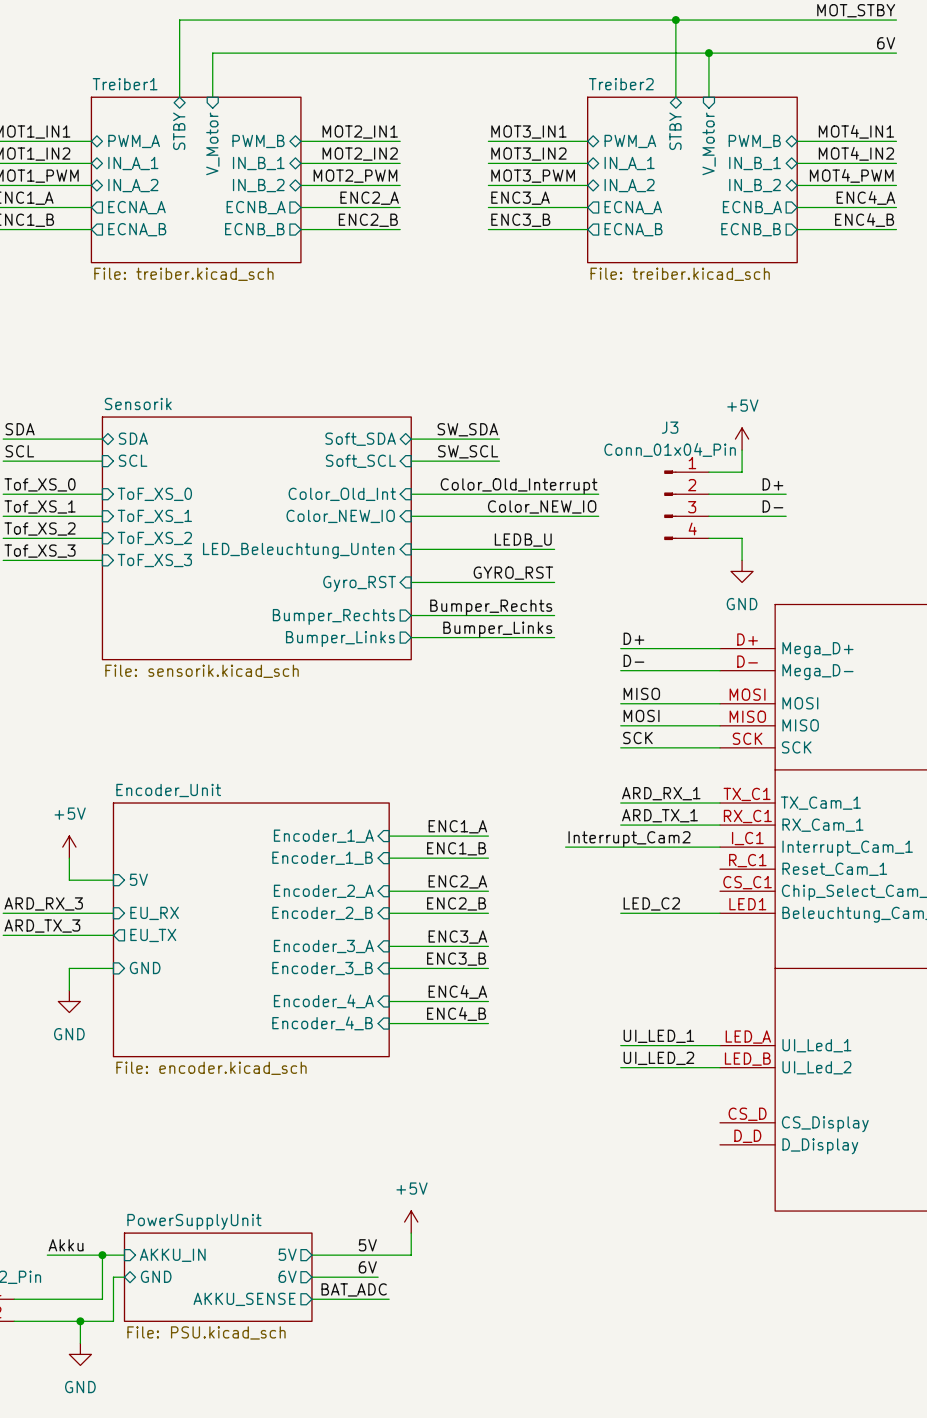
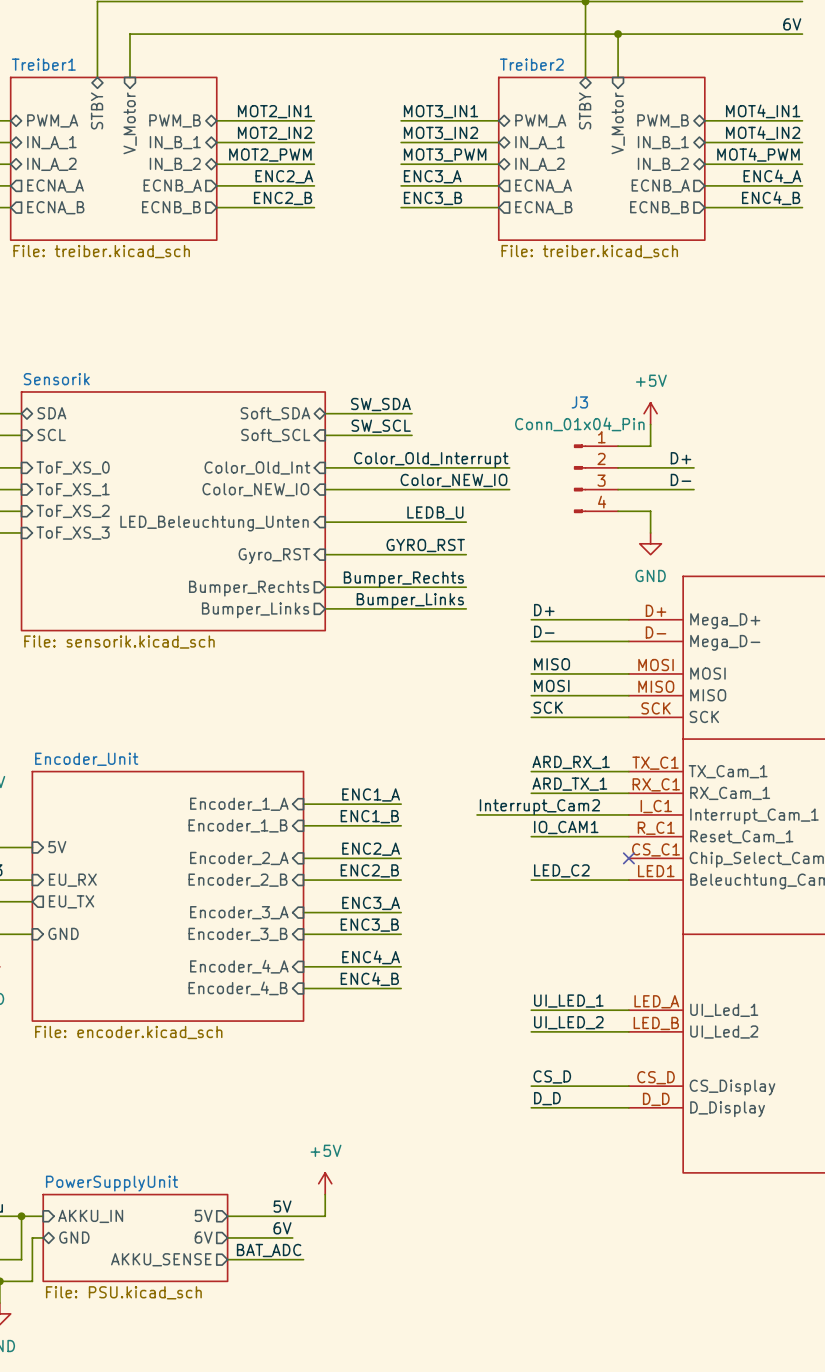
label: none -> IO_CAM1 (566, 827)
wire: none -> (531, 836) (628, 836)
no-connect mark: none -> (628, 858)
label: none -> CS_D (552, 1076)
wire: none -> (531, 1086) (628, 1086)
label: none -> D_D (547, 1098)
wire: none -> (531, 1107) (628, 1107)

